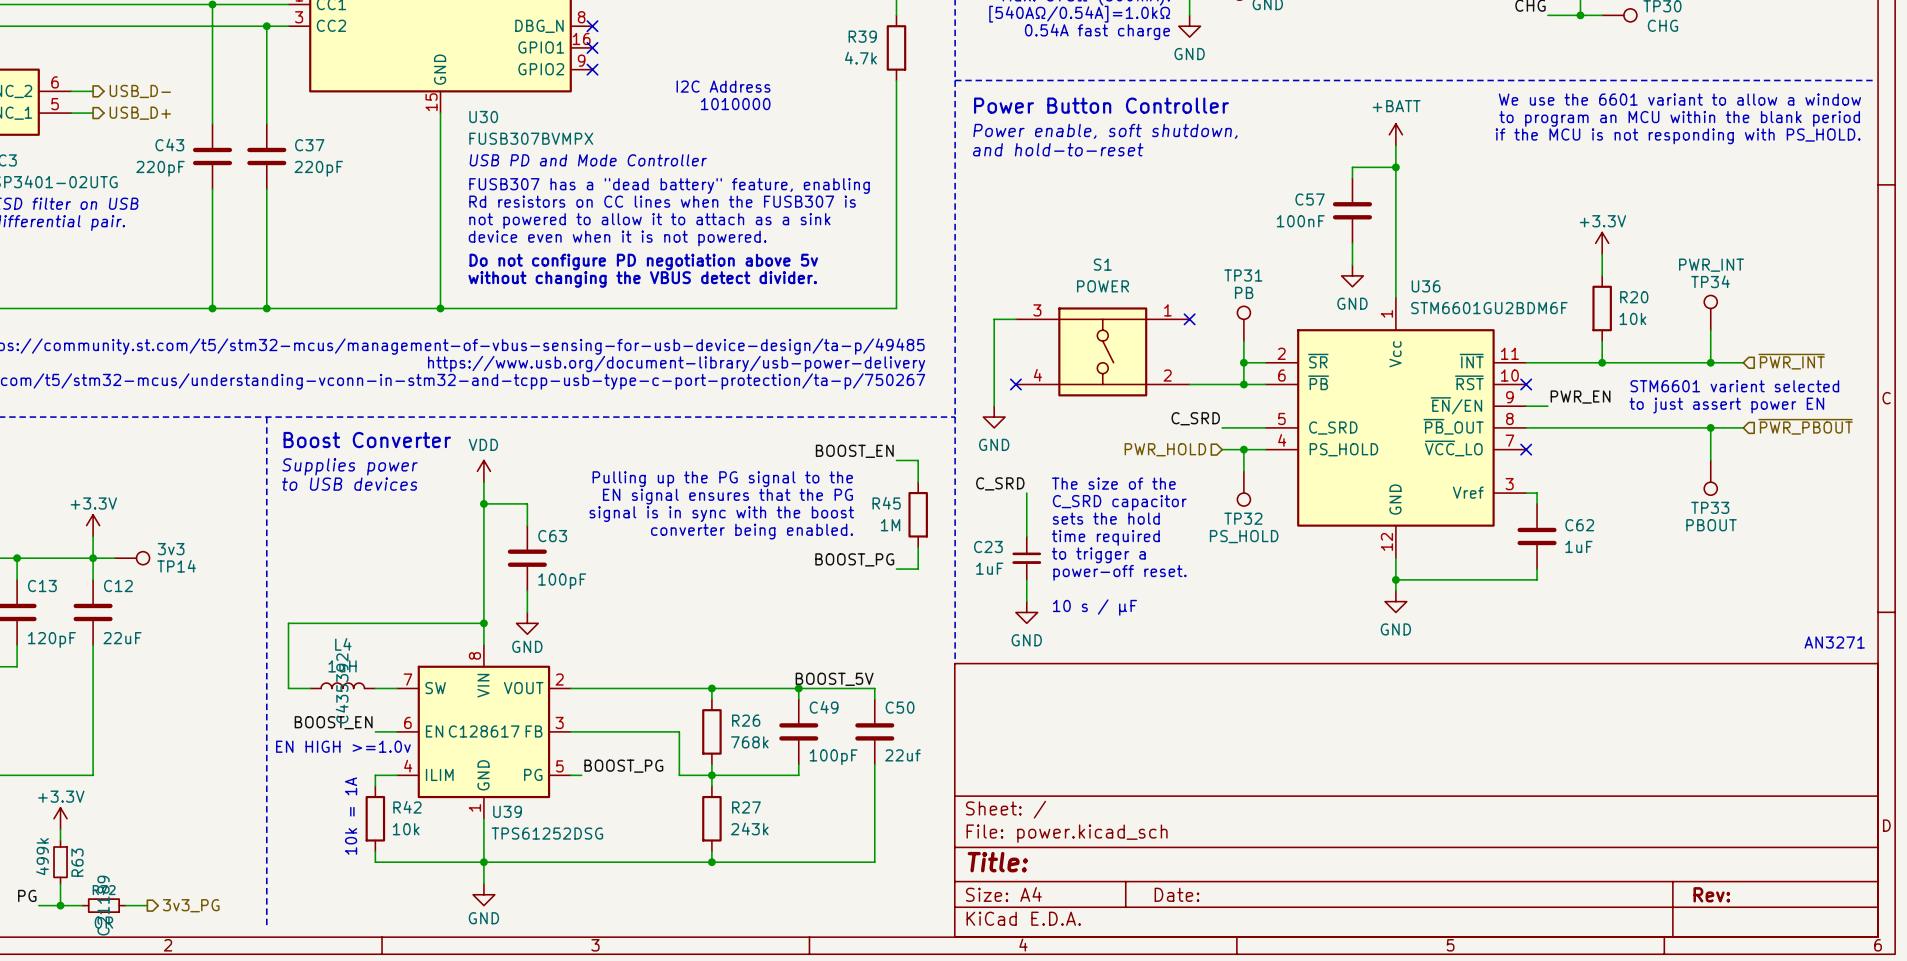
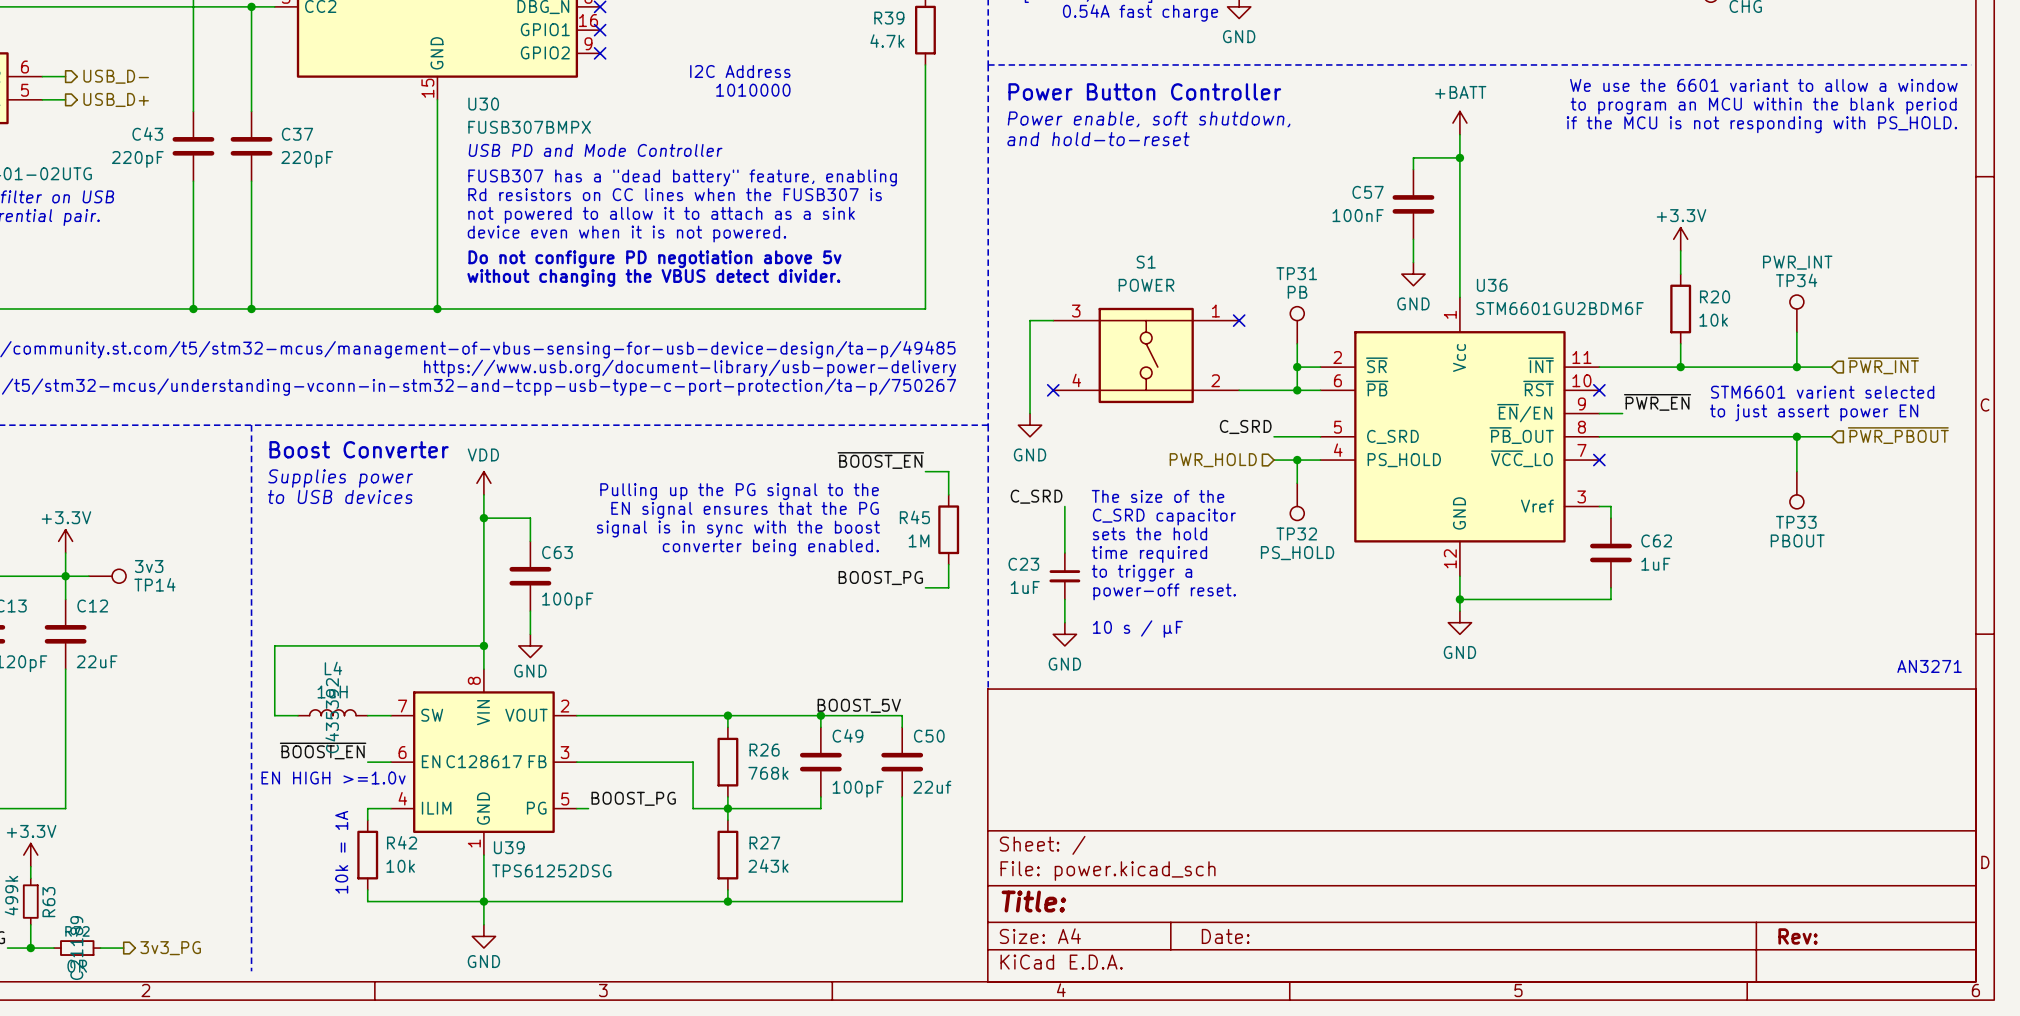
U30 value: FUSB307BVMPX (531, 138) -> FUSB307BMPX (529, 127)
label: PWR_EN (1580, 397) -> ~{PWR_EN} (1657, 402)
label: BOOST_EN (854, 451) -> ~{BOOST_EN} (880, 460)
label: BOOST_EN (333, 722) -> ~{BOOST_EN} (323, 750)

